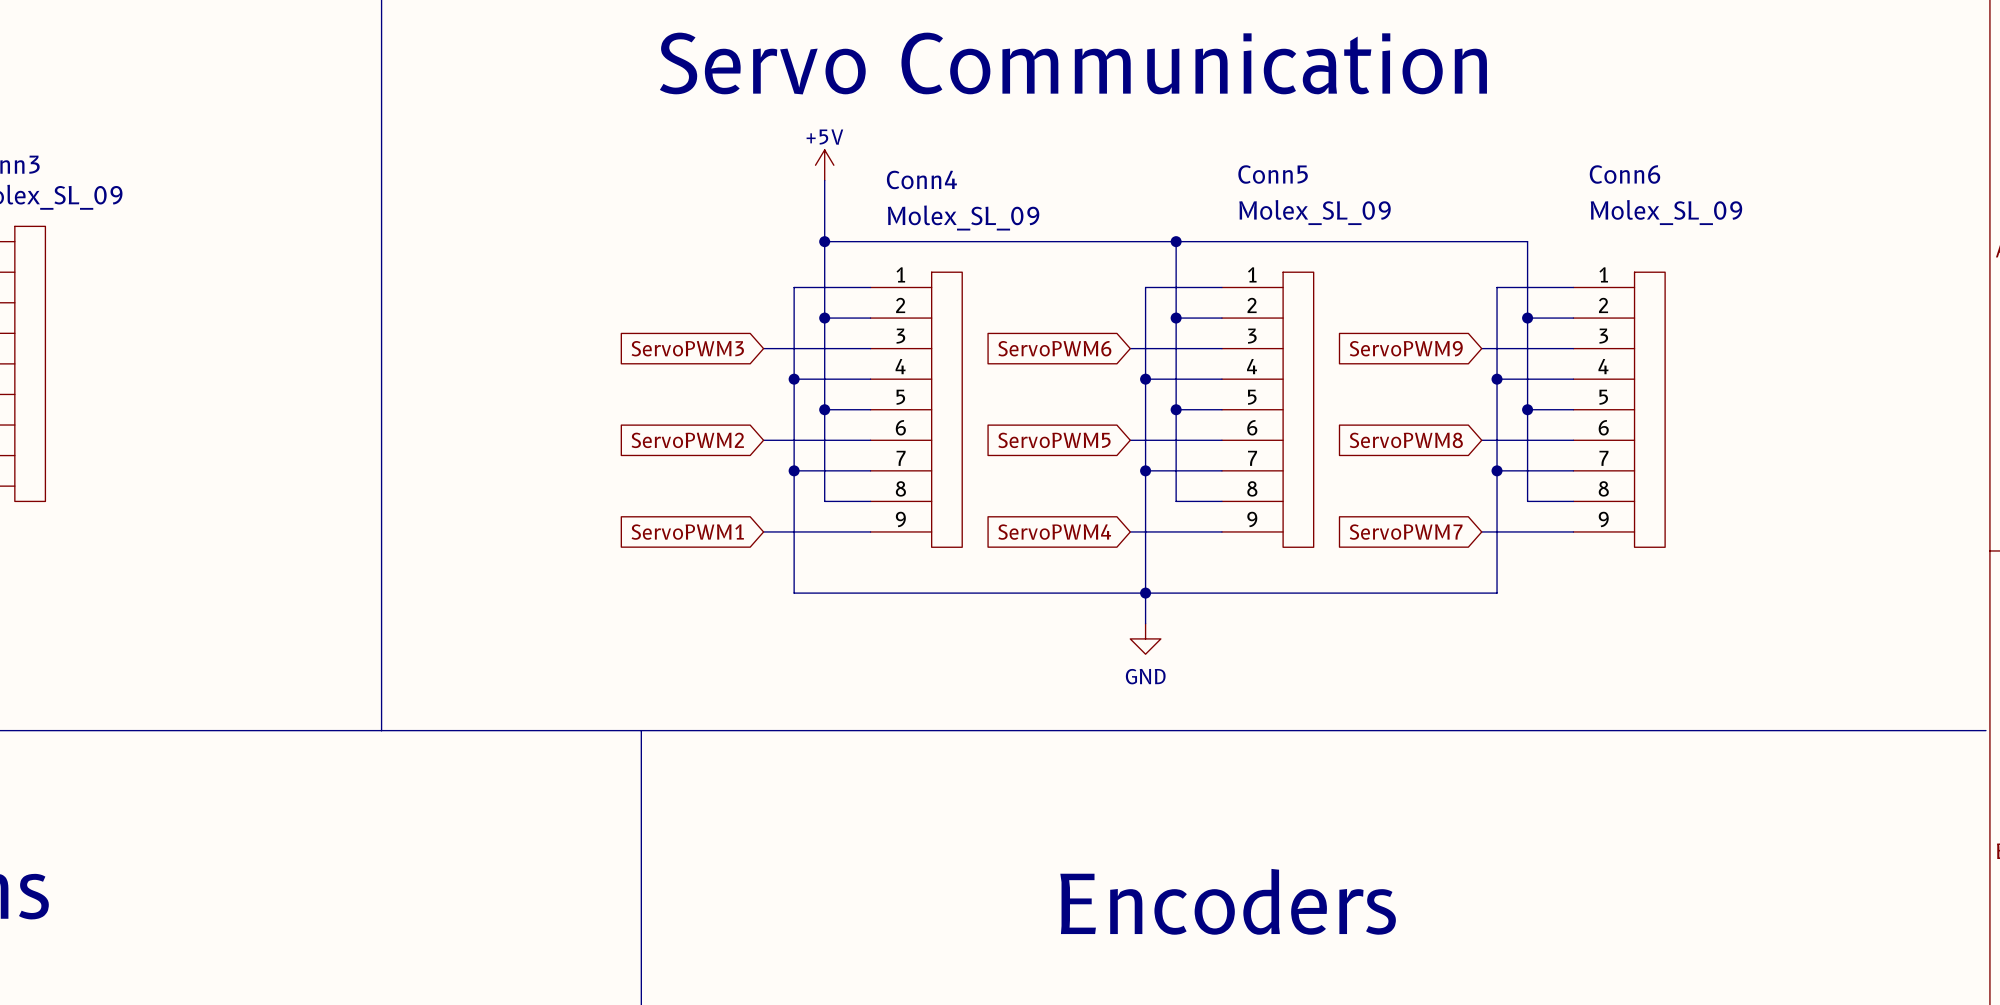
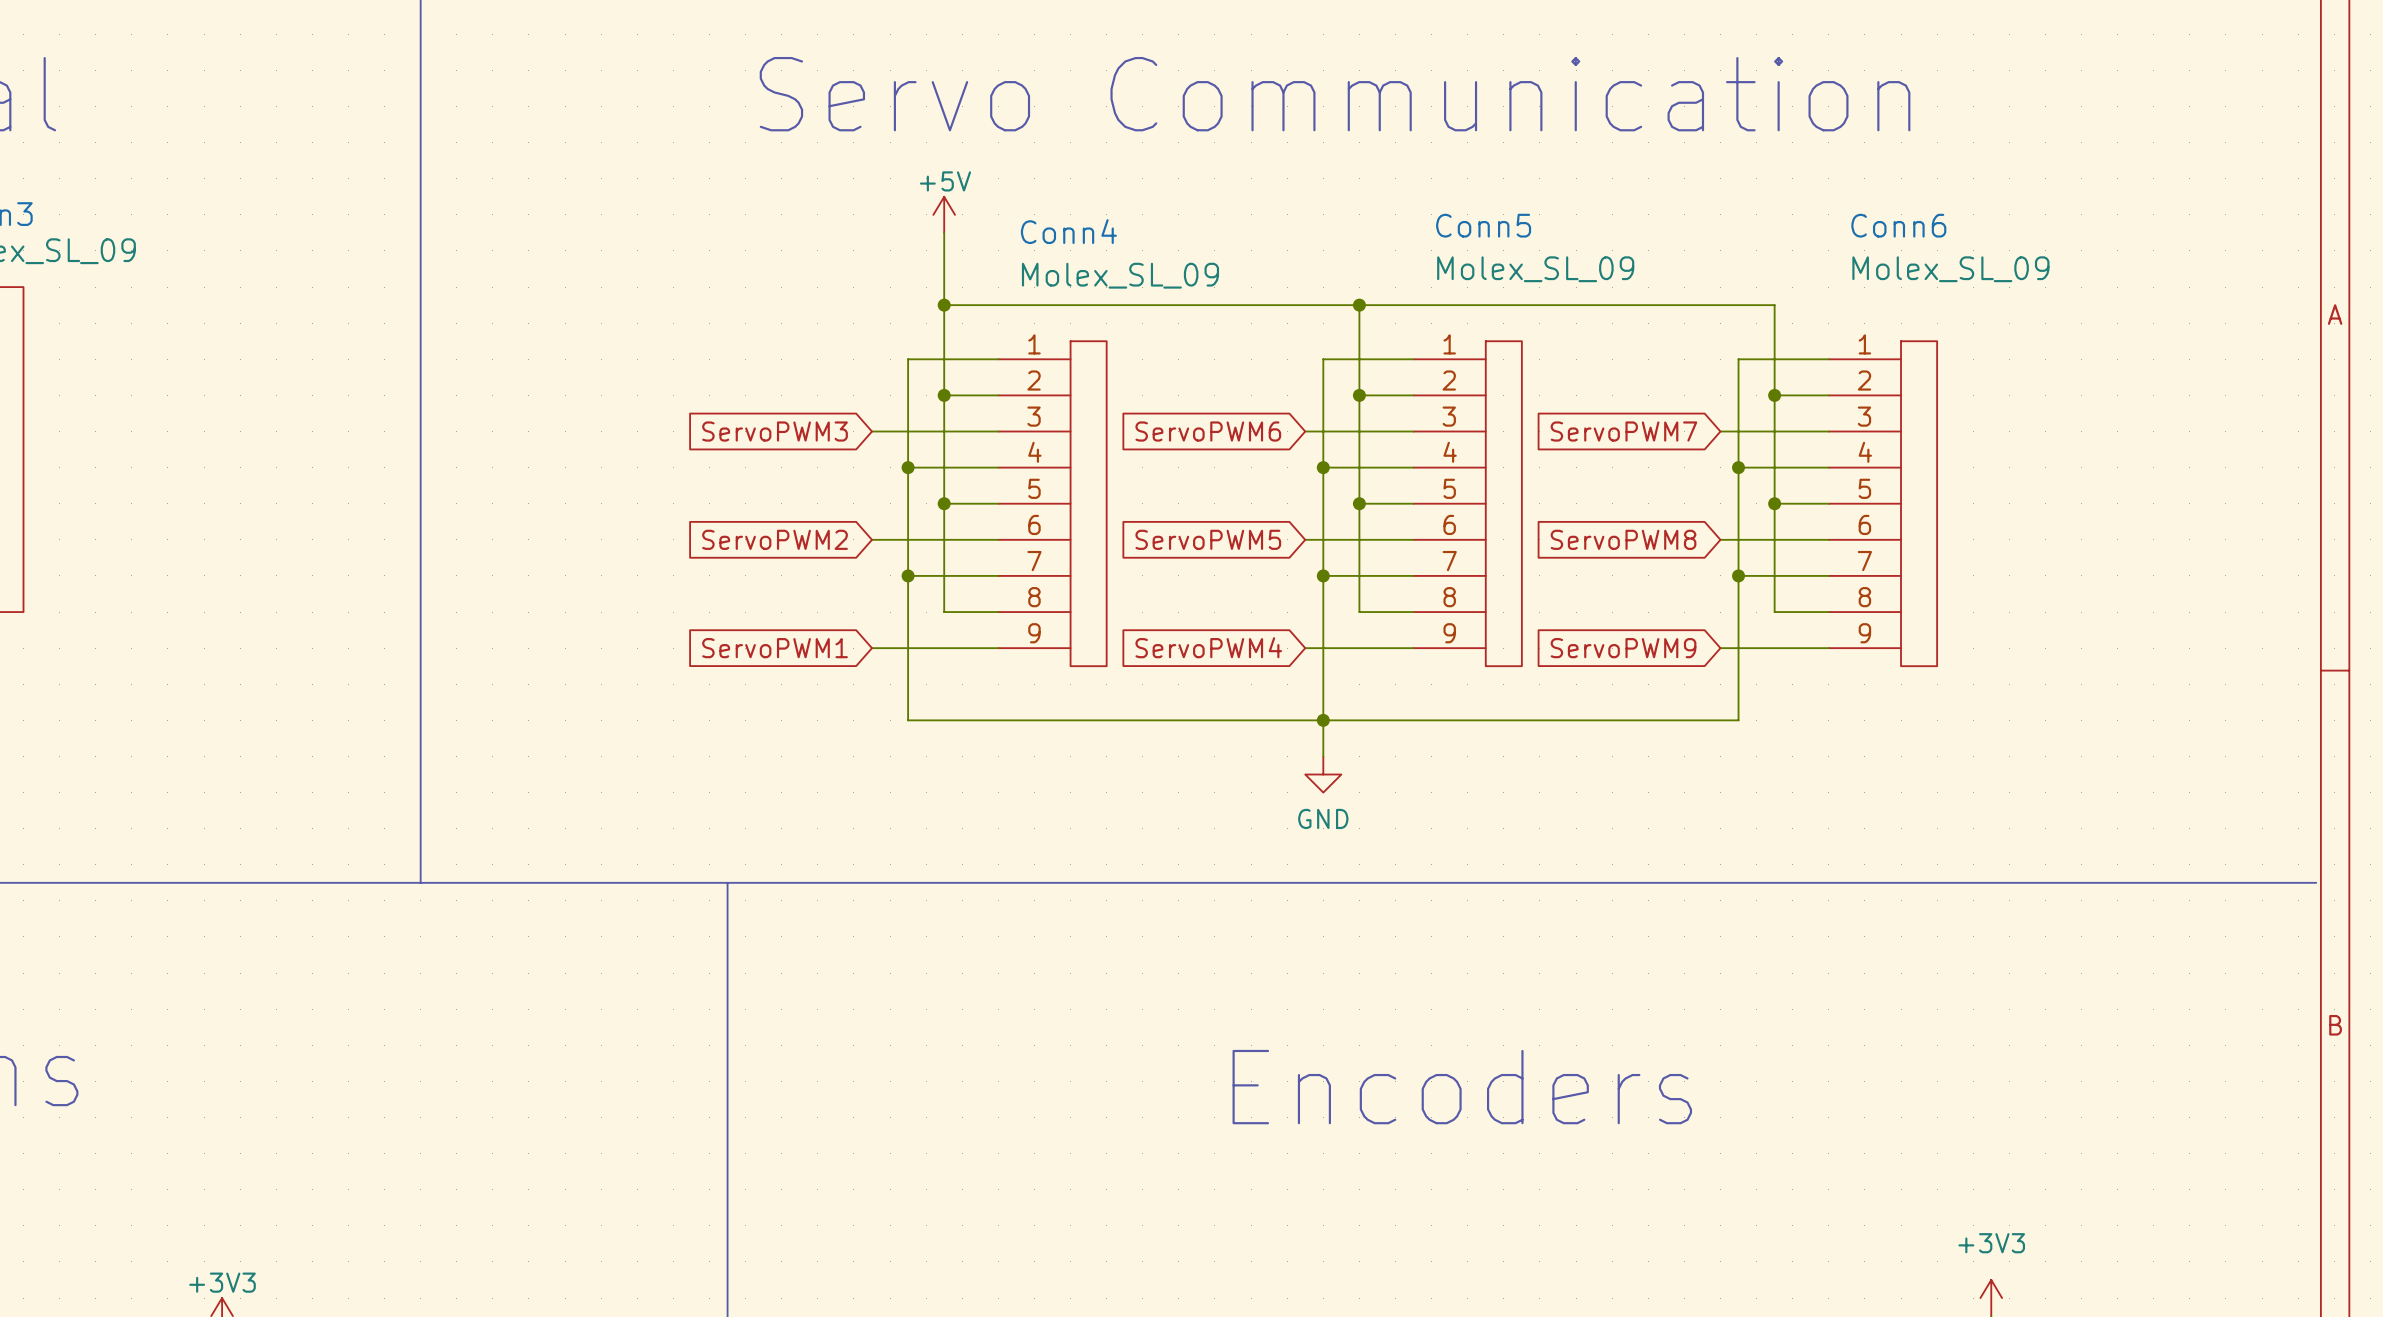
global label: ServoPWM9 (1406, 348) -> ServoPWM7 (1623, 431)
global label: ServoPWM7 (1406, 532) -> ServoPWM9 (1623, 648)

